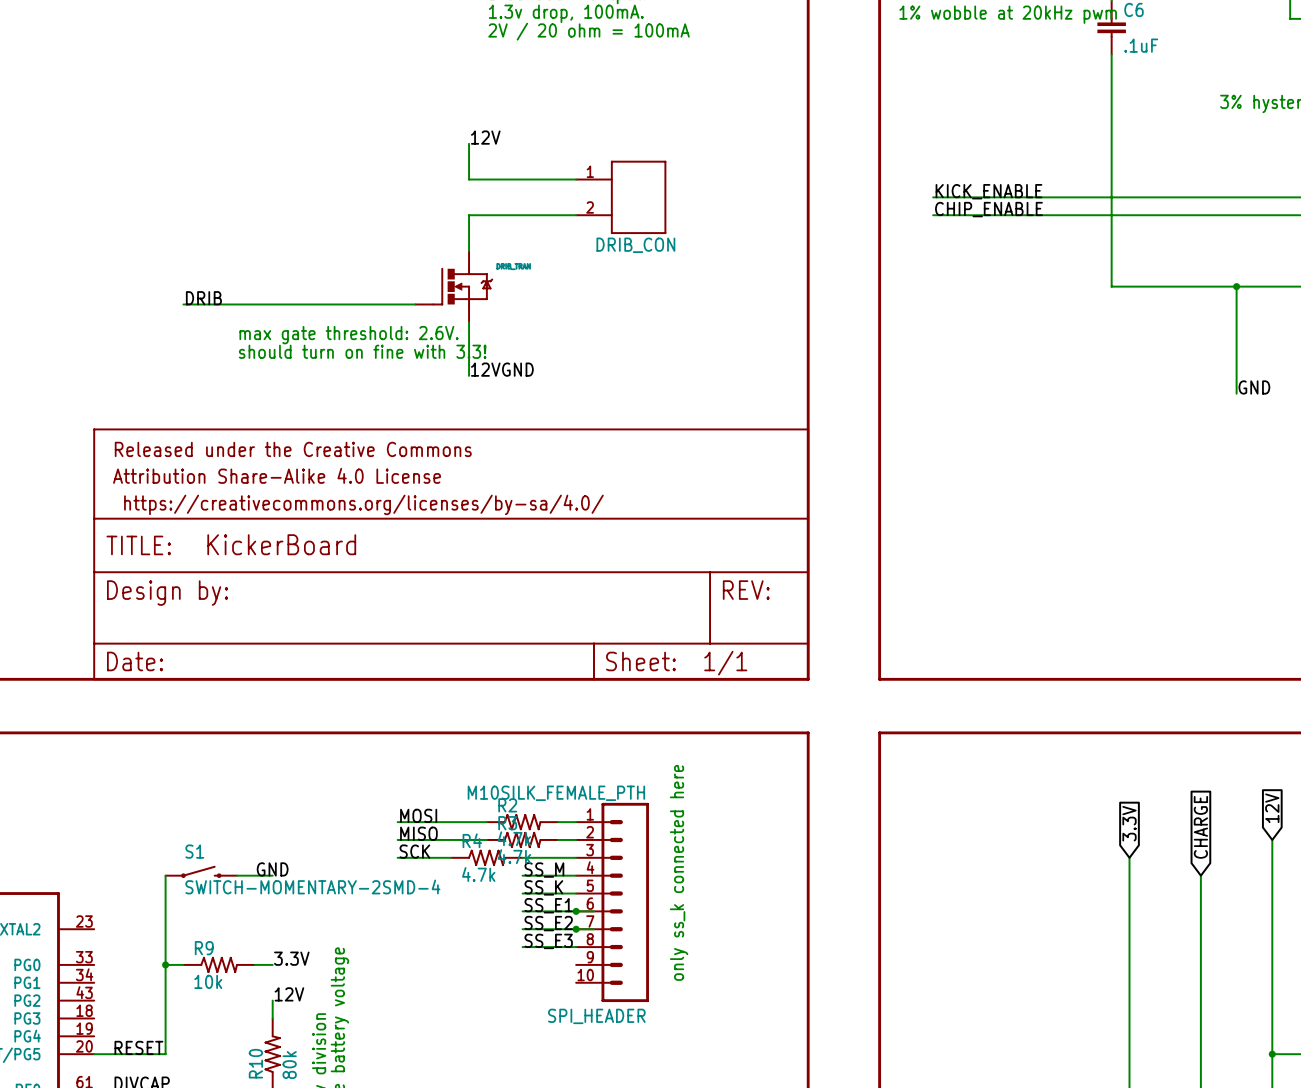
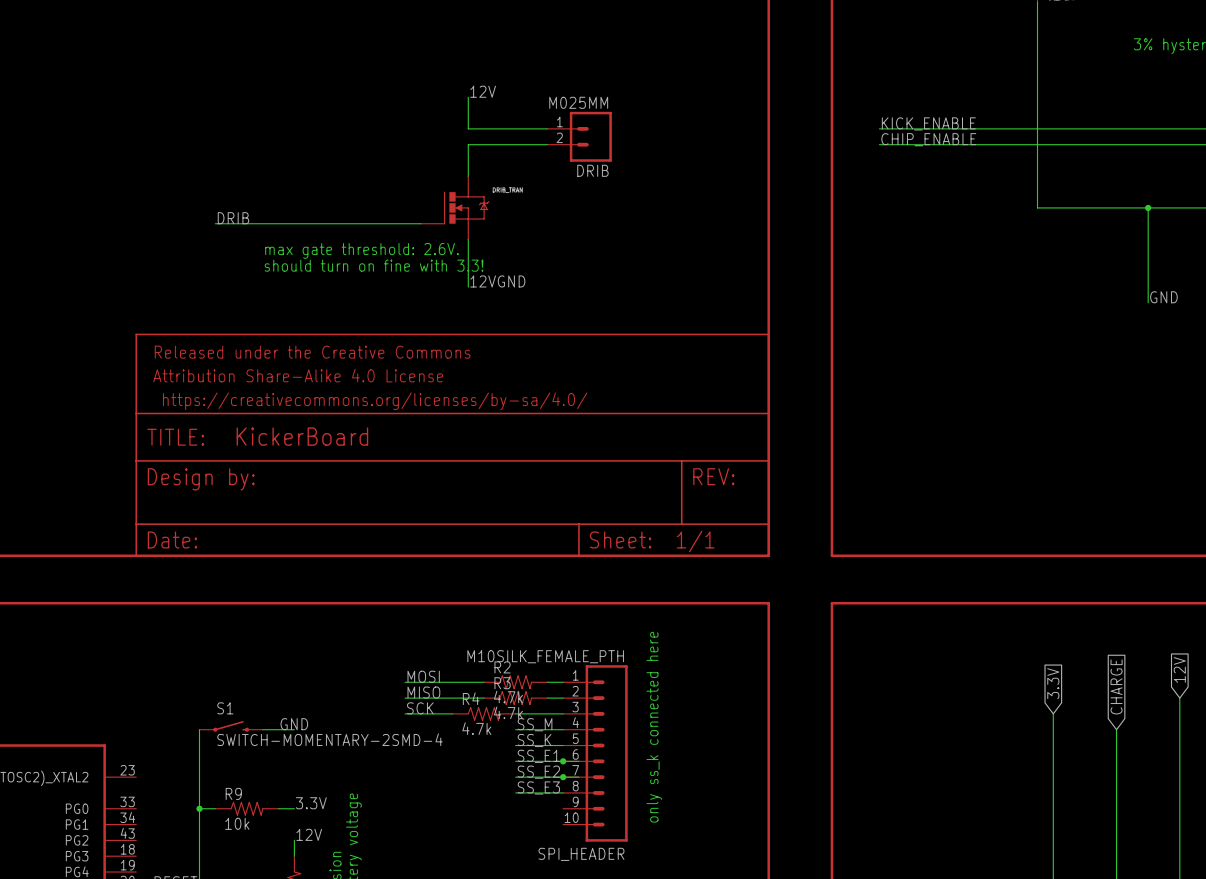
label position: 12V (485, 137) -> 12V (483, 91)
wire: (469, 143) (469, 161) -> none
wire: (469, 179) (576, 179) -> (468, 113) (468, 128) (547, 128)
DRIB_CON: (621, 197) -> none
DRIB: none -> M025MM (579, 136)

